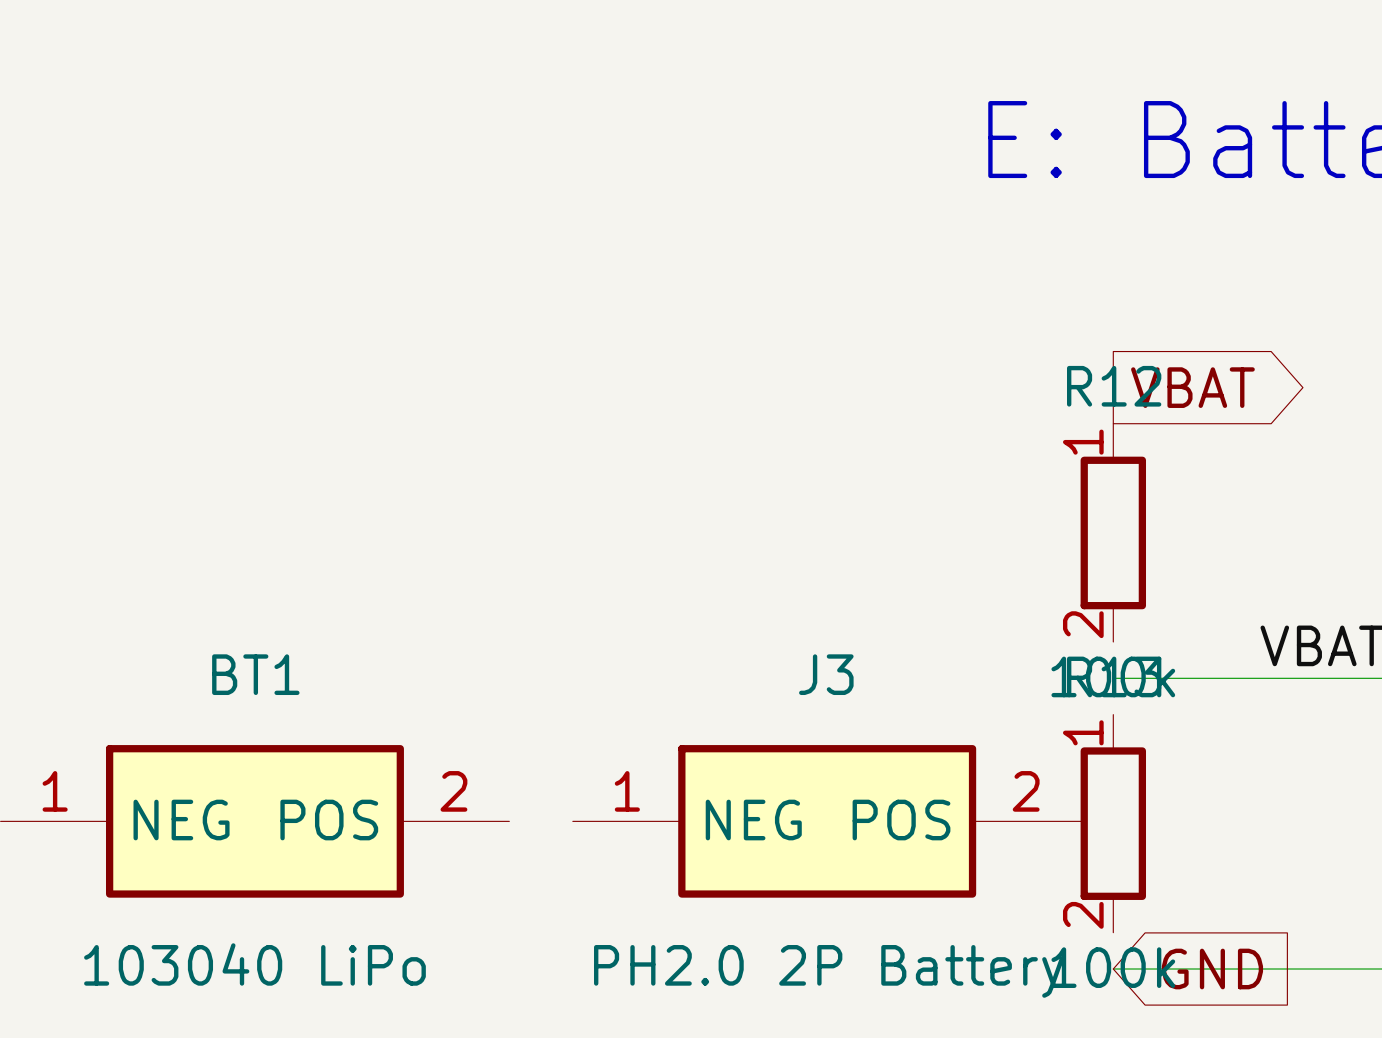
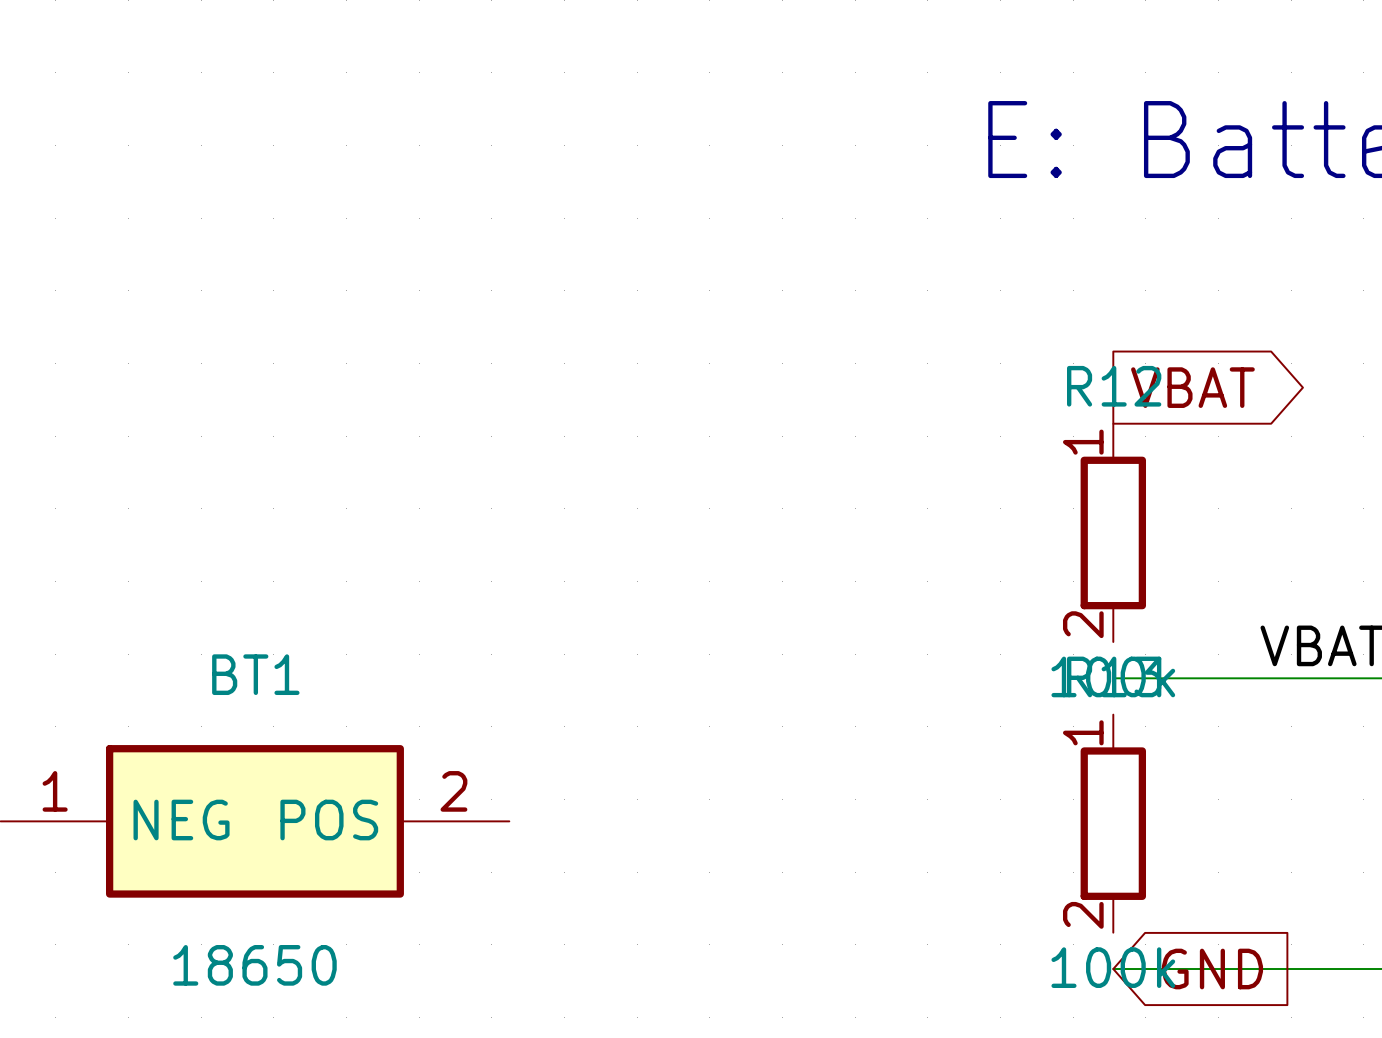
J3: PH2.0 2P Battery (827, 821) -> none
BT1 value: 103040 LiPo (254, 964) -> 18650 (254, 965)

